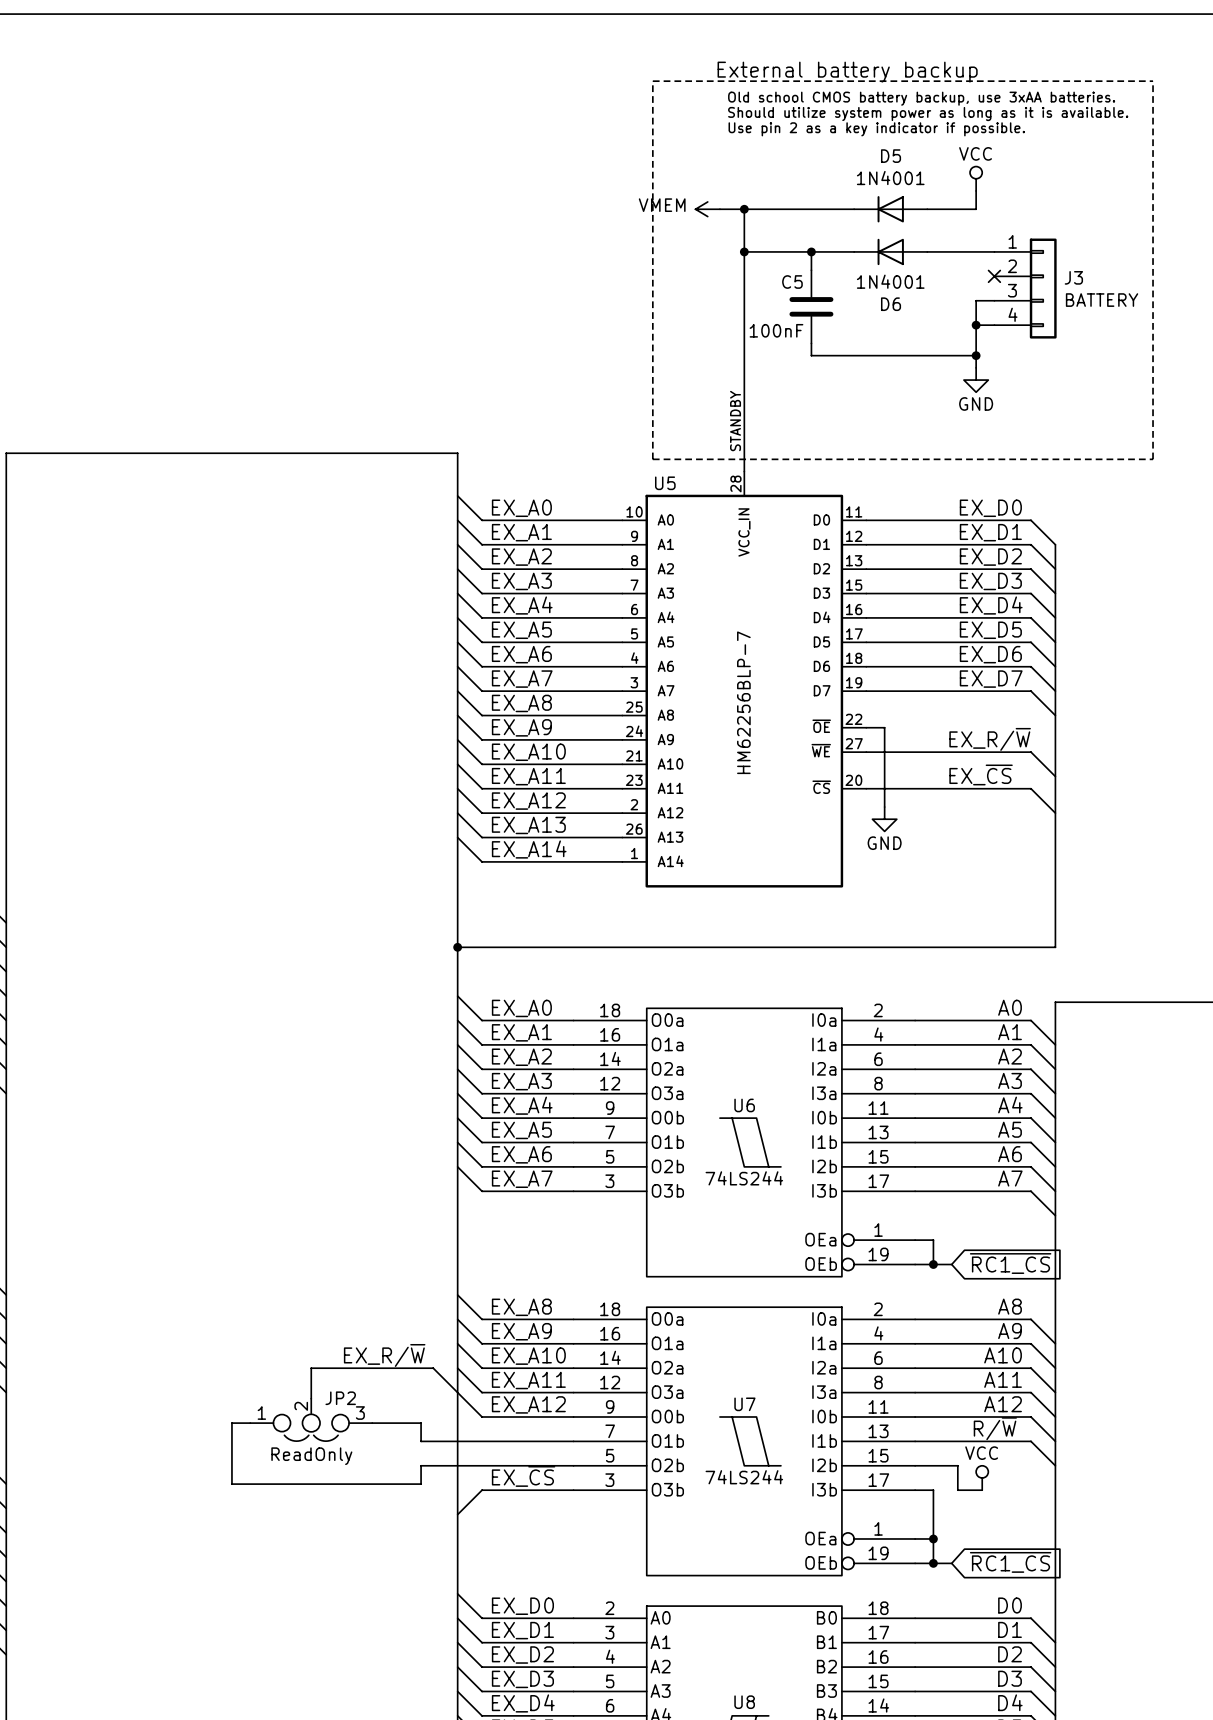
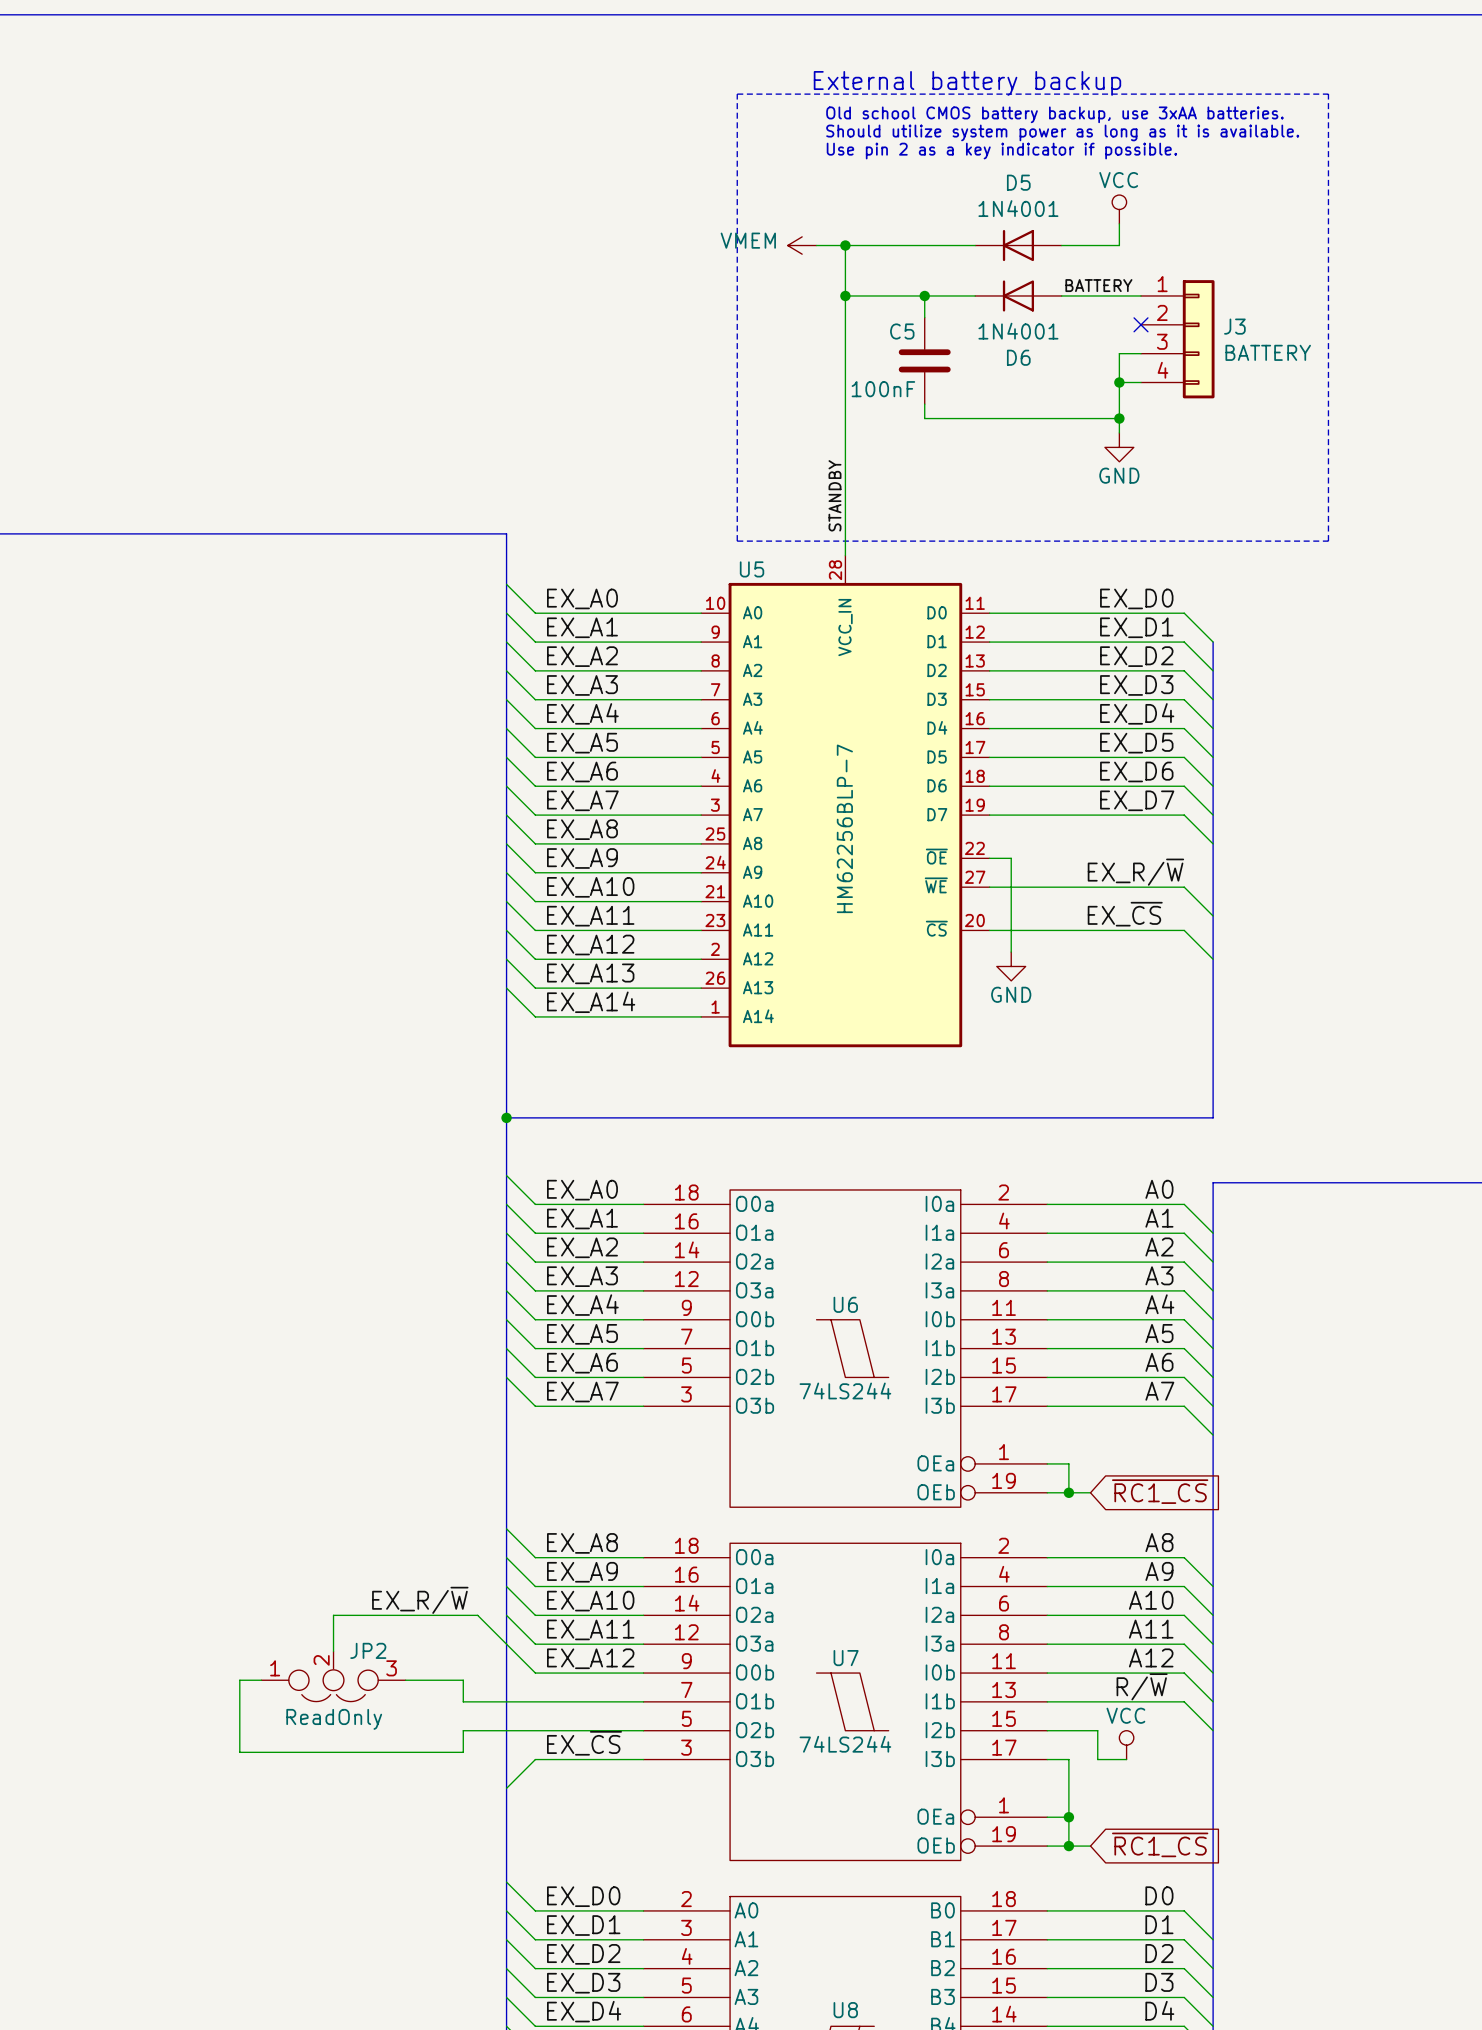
label: none -> BATTERY (1098, 285)

